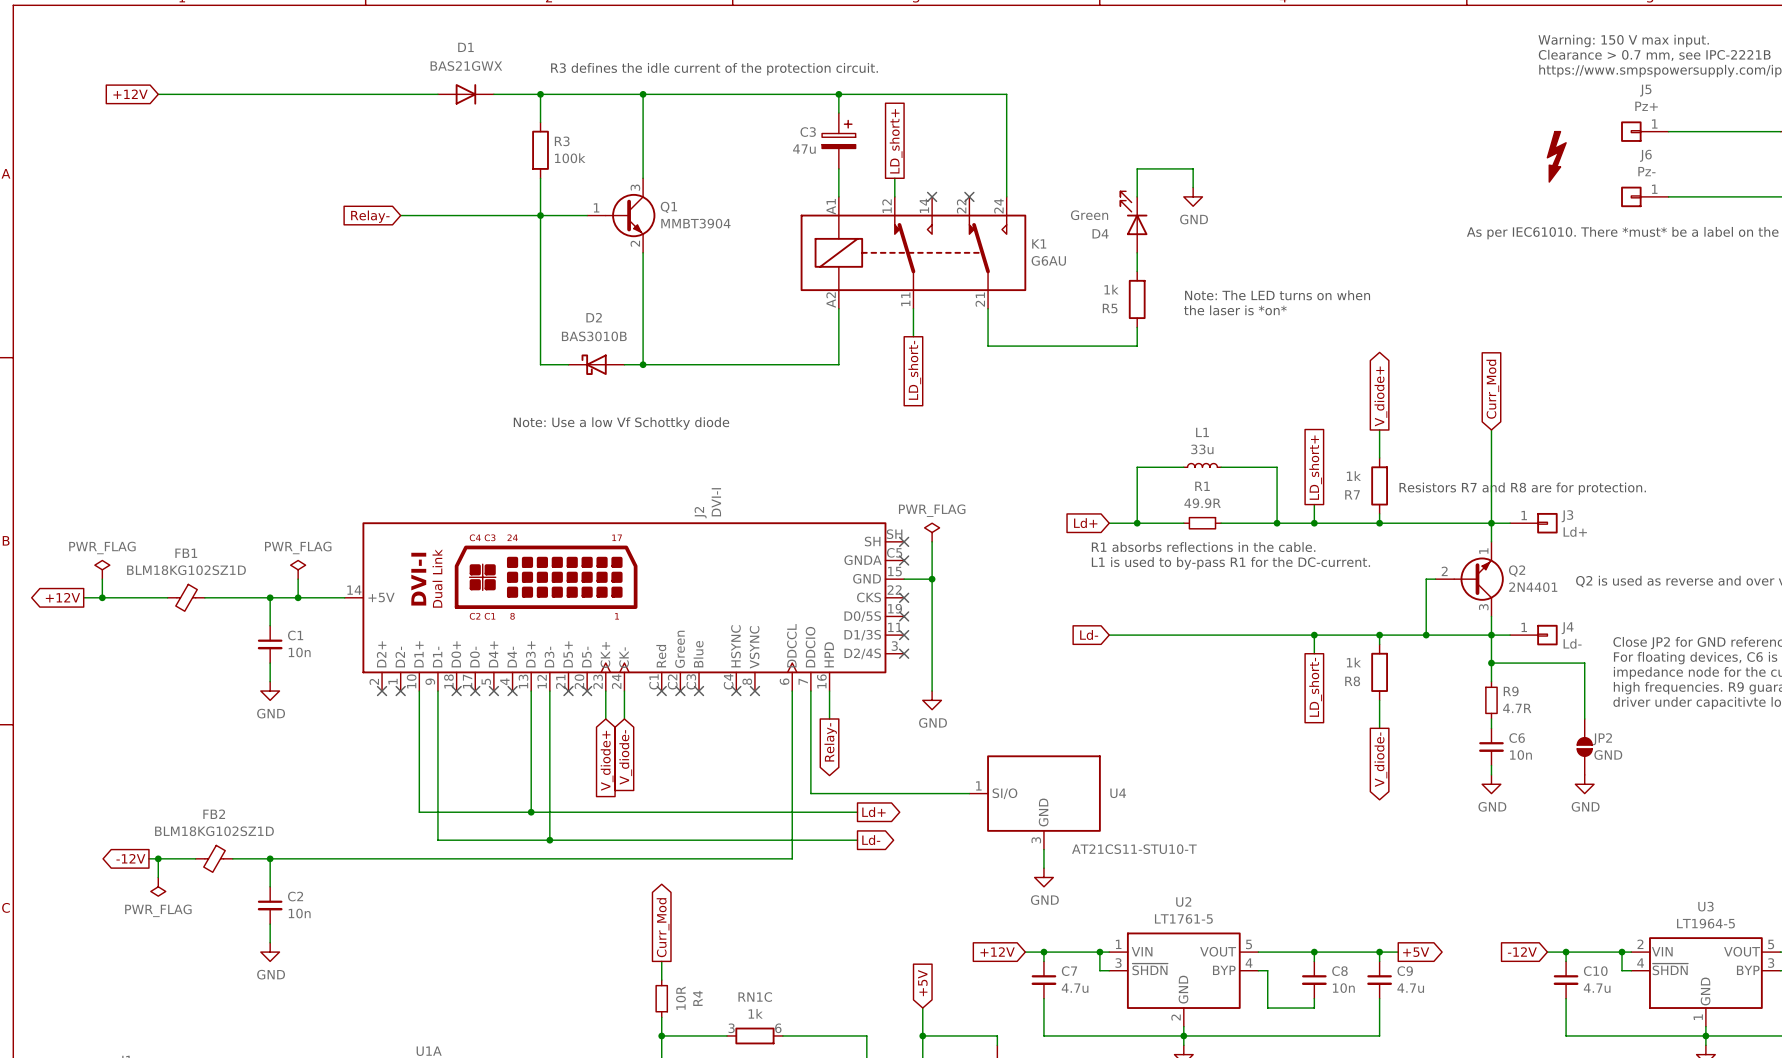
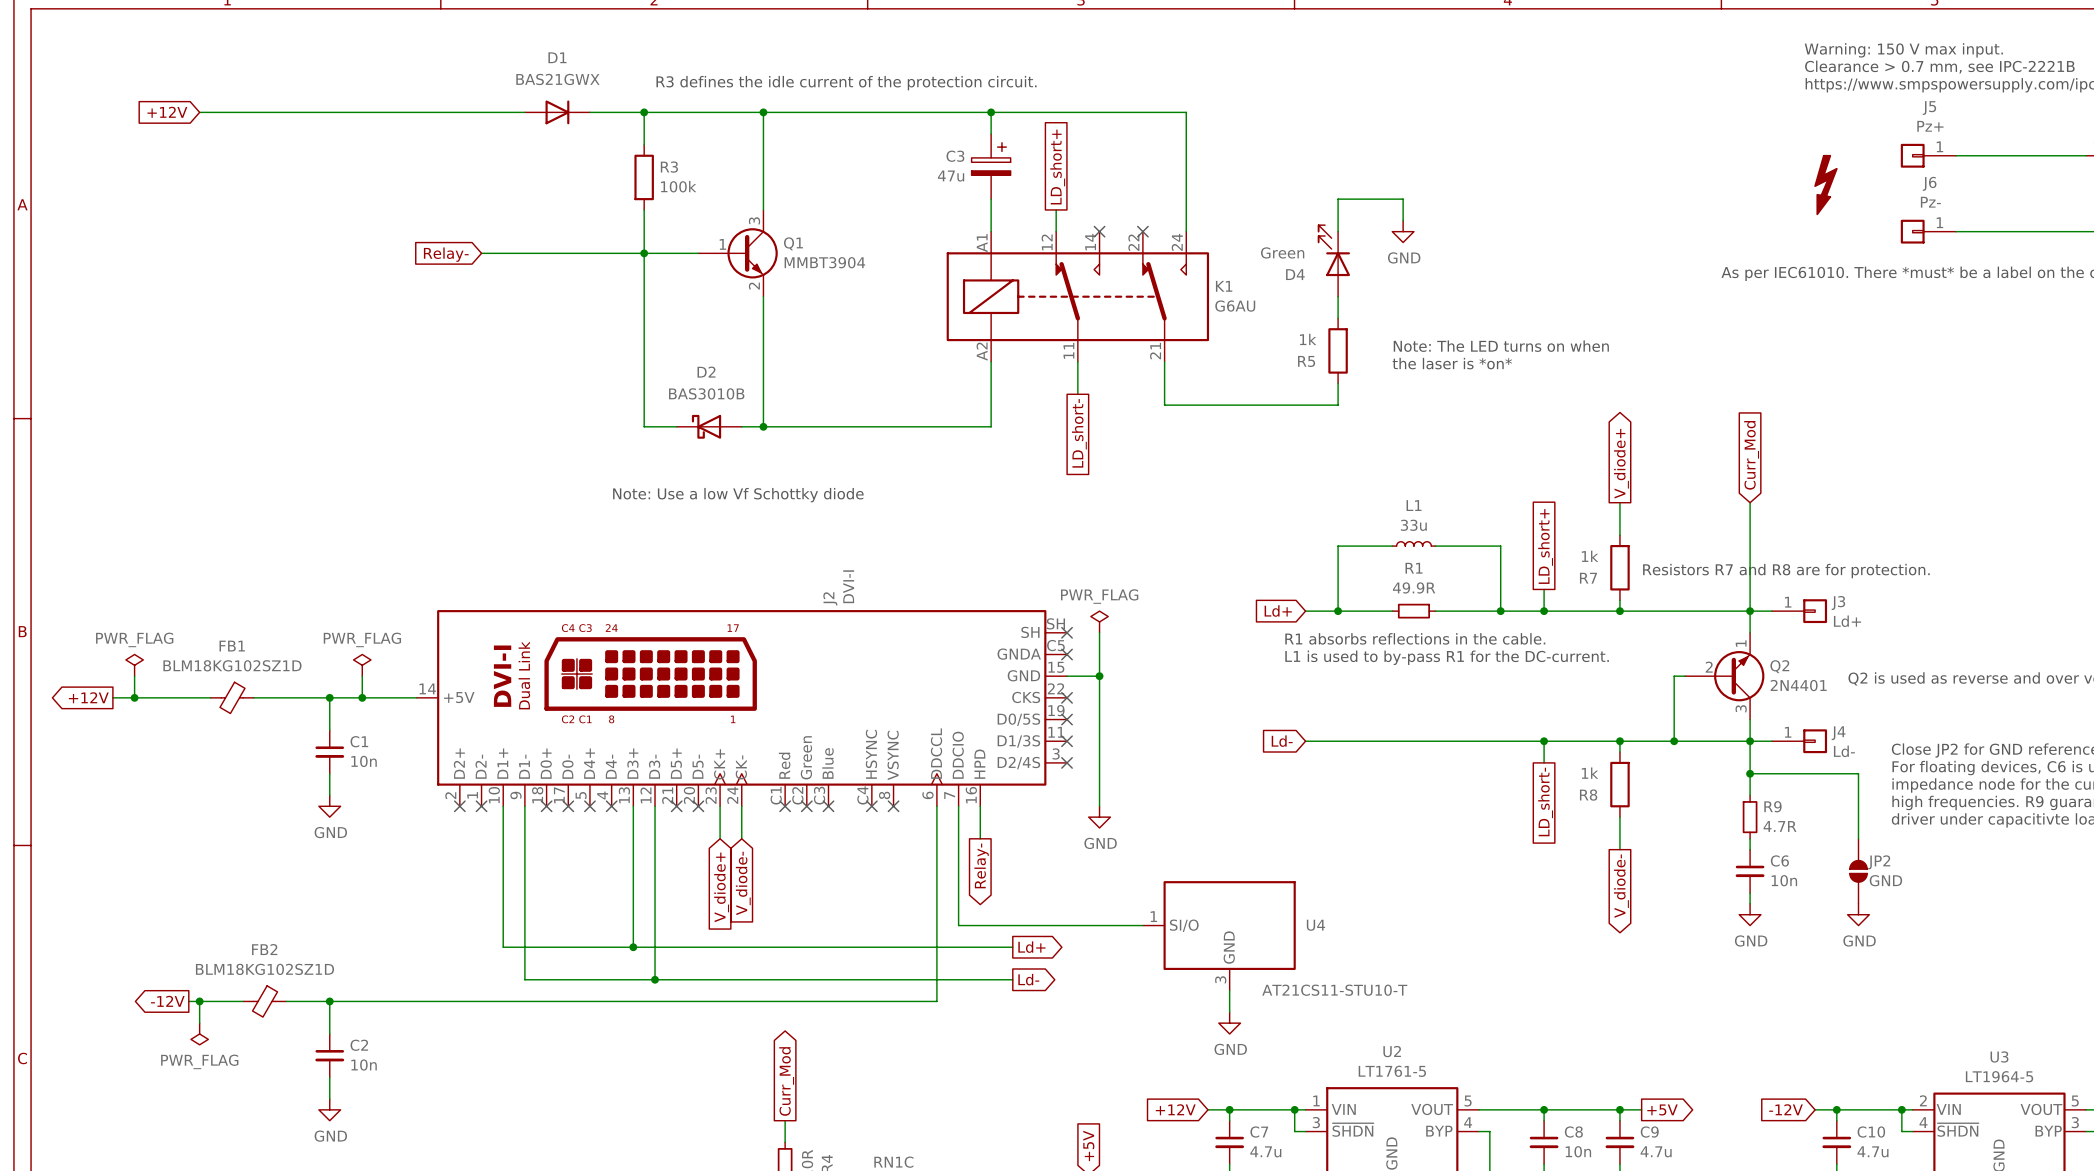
Q1 symbol: [587, 178, 656, 253] -> [698, 209, 778, 297]
Q2 symbol: [1435, 541, 1504, 617] -> [1685, 632, 1765, 720]

